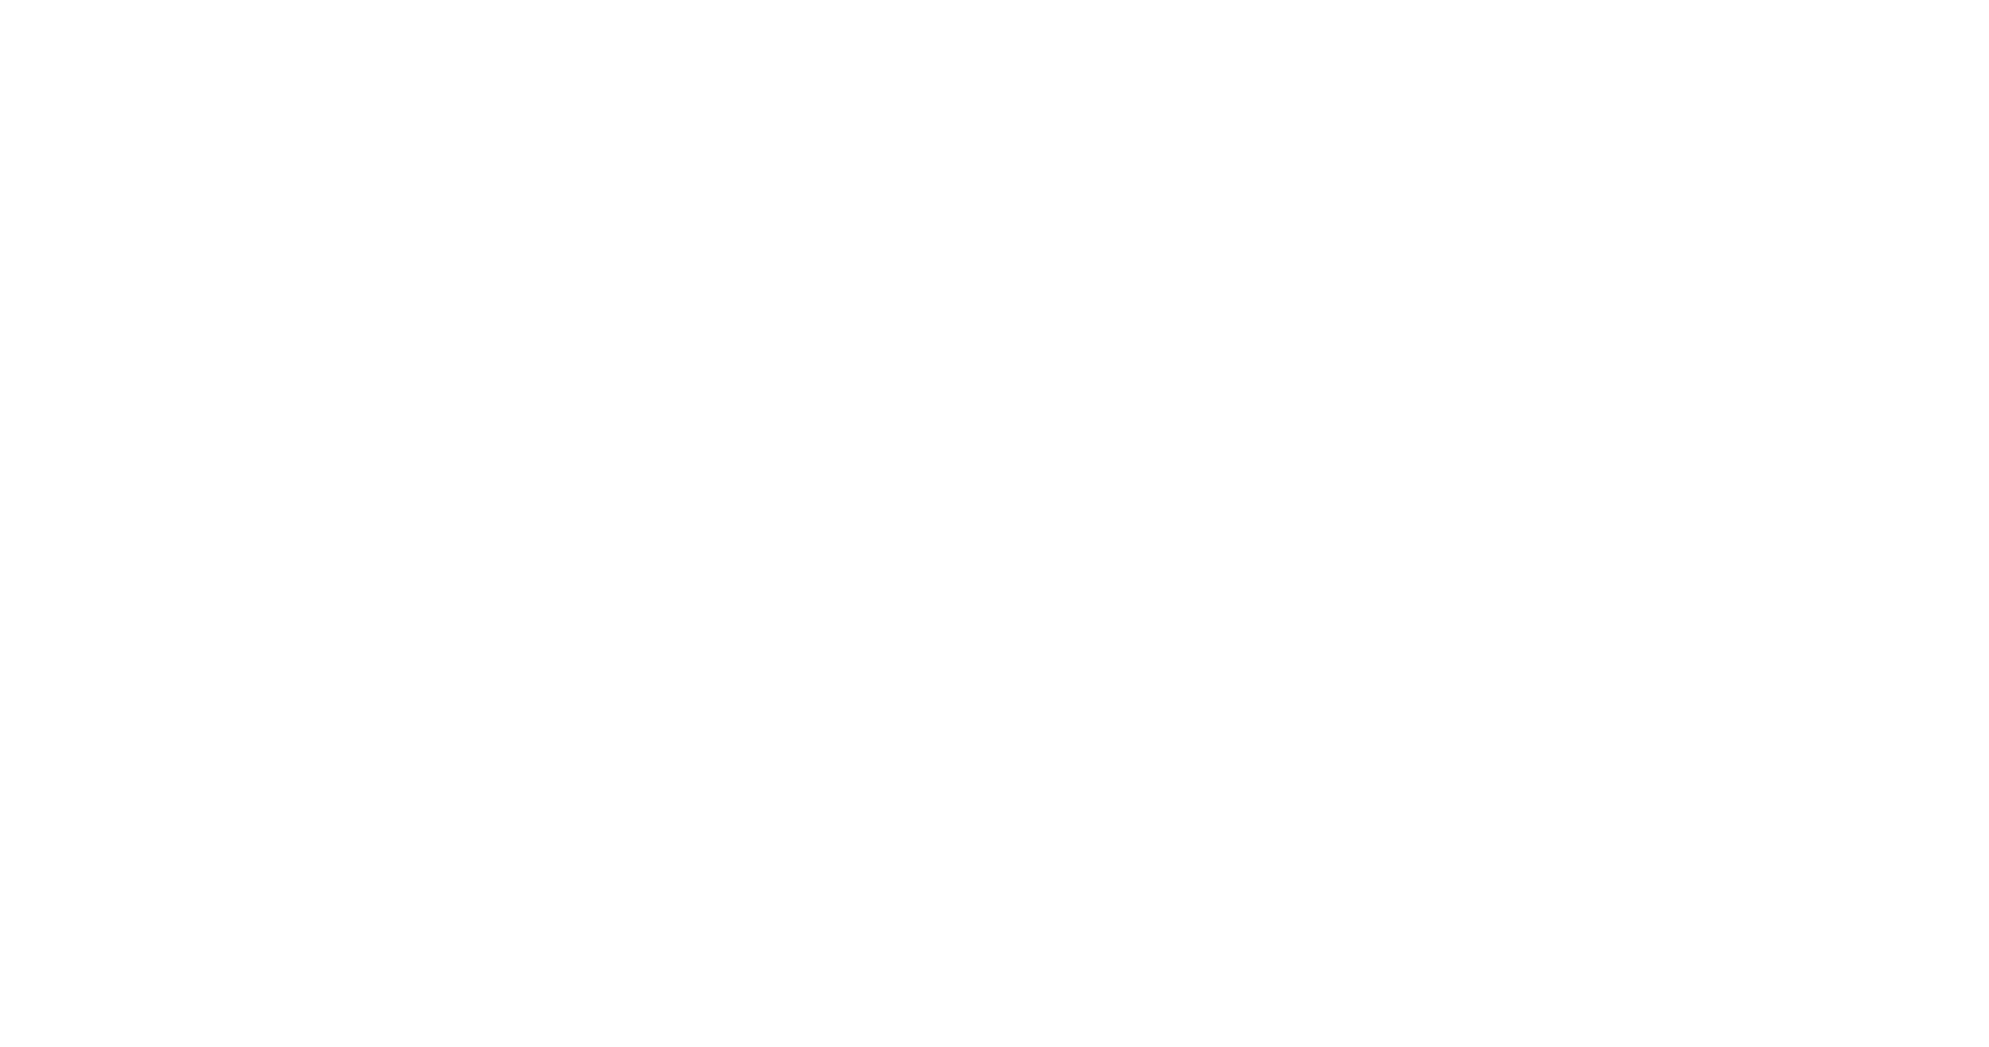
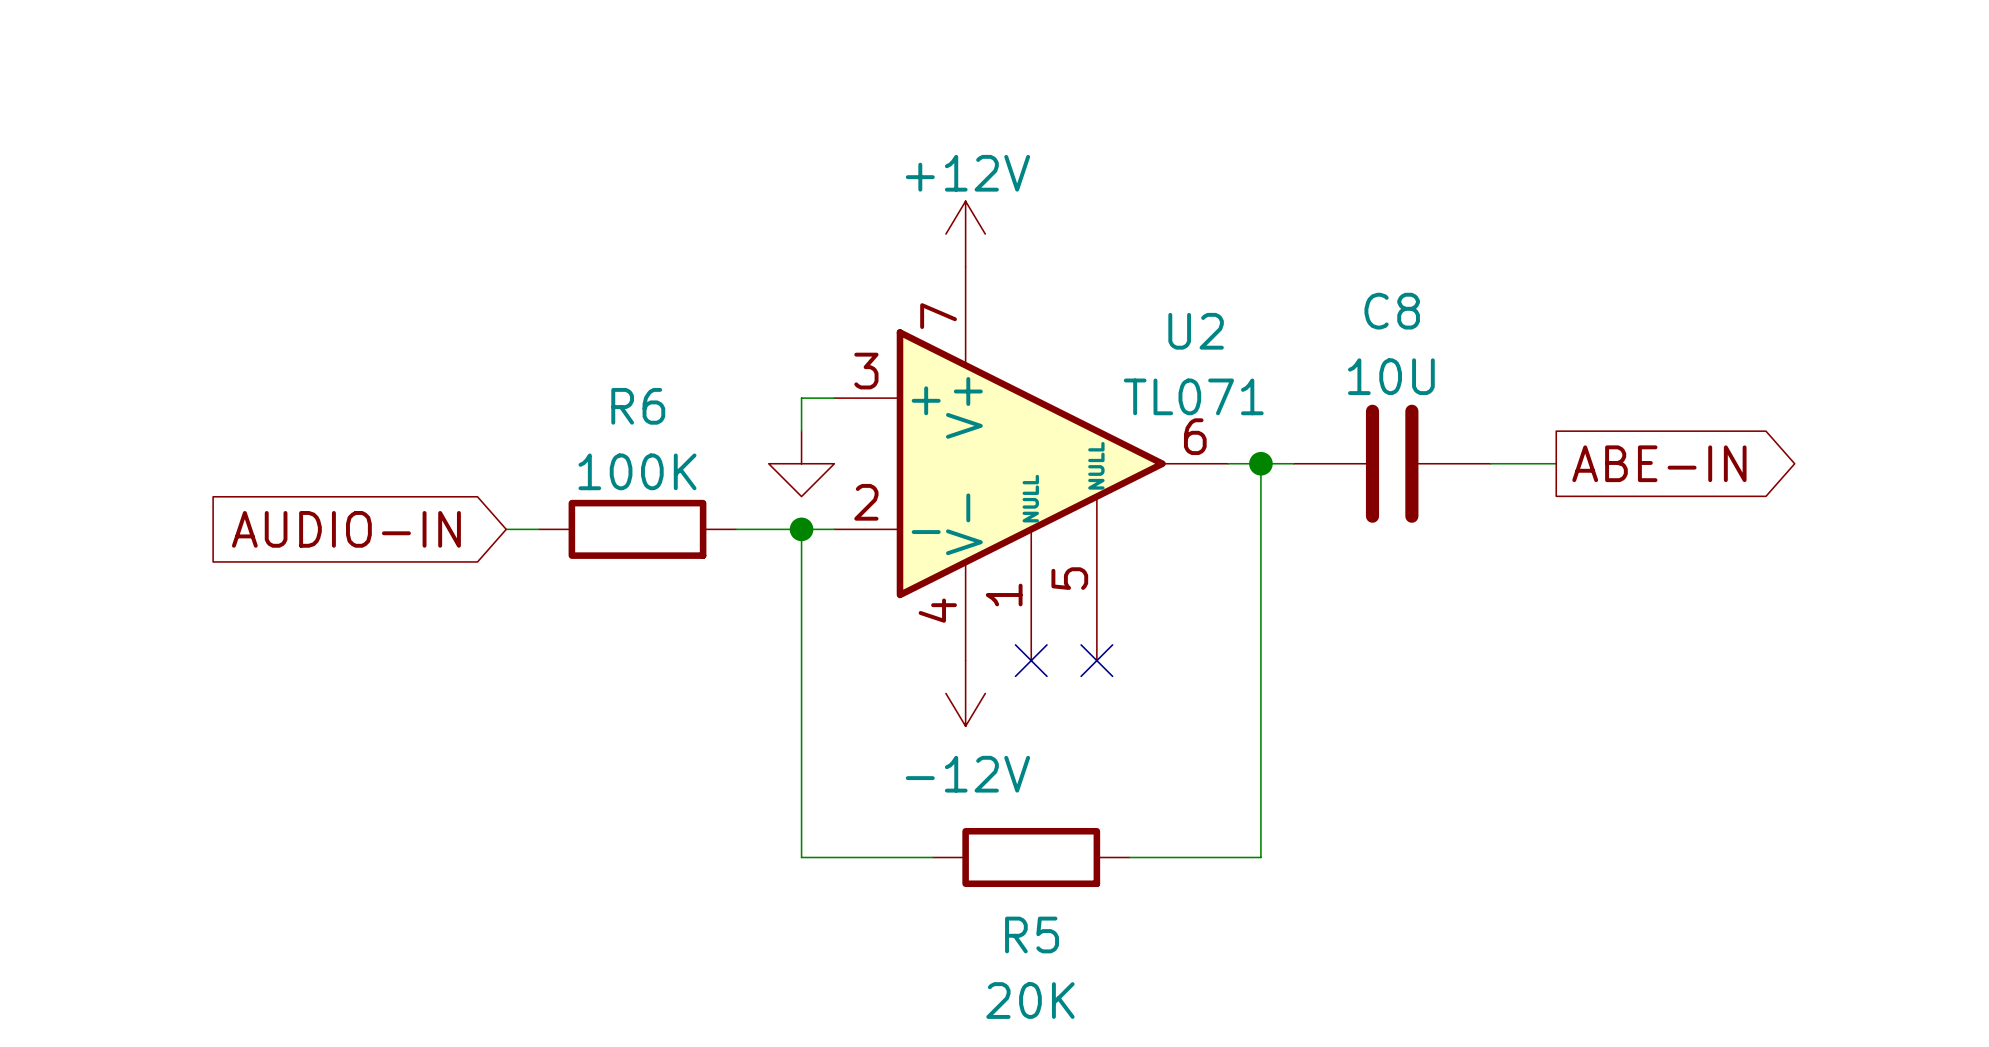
power symbol: none -> +12V (965, 234)
wire: none -> (834, 398) (801, 398) (801, 430)
power symbol: none -> (801, 463)
U2: none -> TL071 (1031, 463)
wire: none -> (1228, 463) (1293, 463)
wire: none -> (1260, 463) (1260, 857) (1129, 857)
junction: none -> (1260, 463)
C8: none -> 10U (1392, 463)
wire: none -> (1490, 463) (1556, 463)
global label: none -> ABE-IN (1659, 463)
global label: none -> AUDIO-IN (346, 529)
wire: none -> (506, 529) (539, 529)
R6: none -> 100K (637, 529)
wire: none -> (735, 529) (834, 529)
wire: none -> (801, 529) (801, 857) (932, 857)
junction: none -> (801, 529)
no-connect mark: none -> (1031, 660)
no-connect mark: none -> (1096, 660)
power symbol: none -> -12V (965, 693)
R5: none -> 20K (1031, 857)

